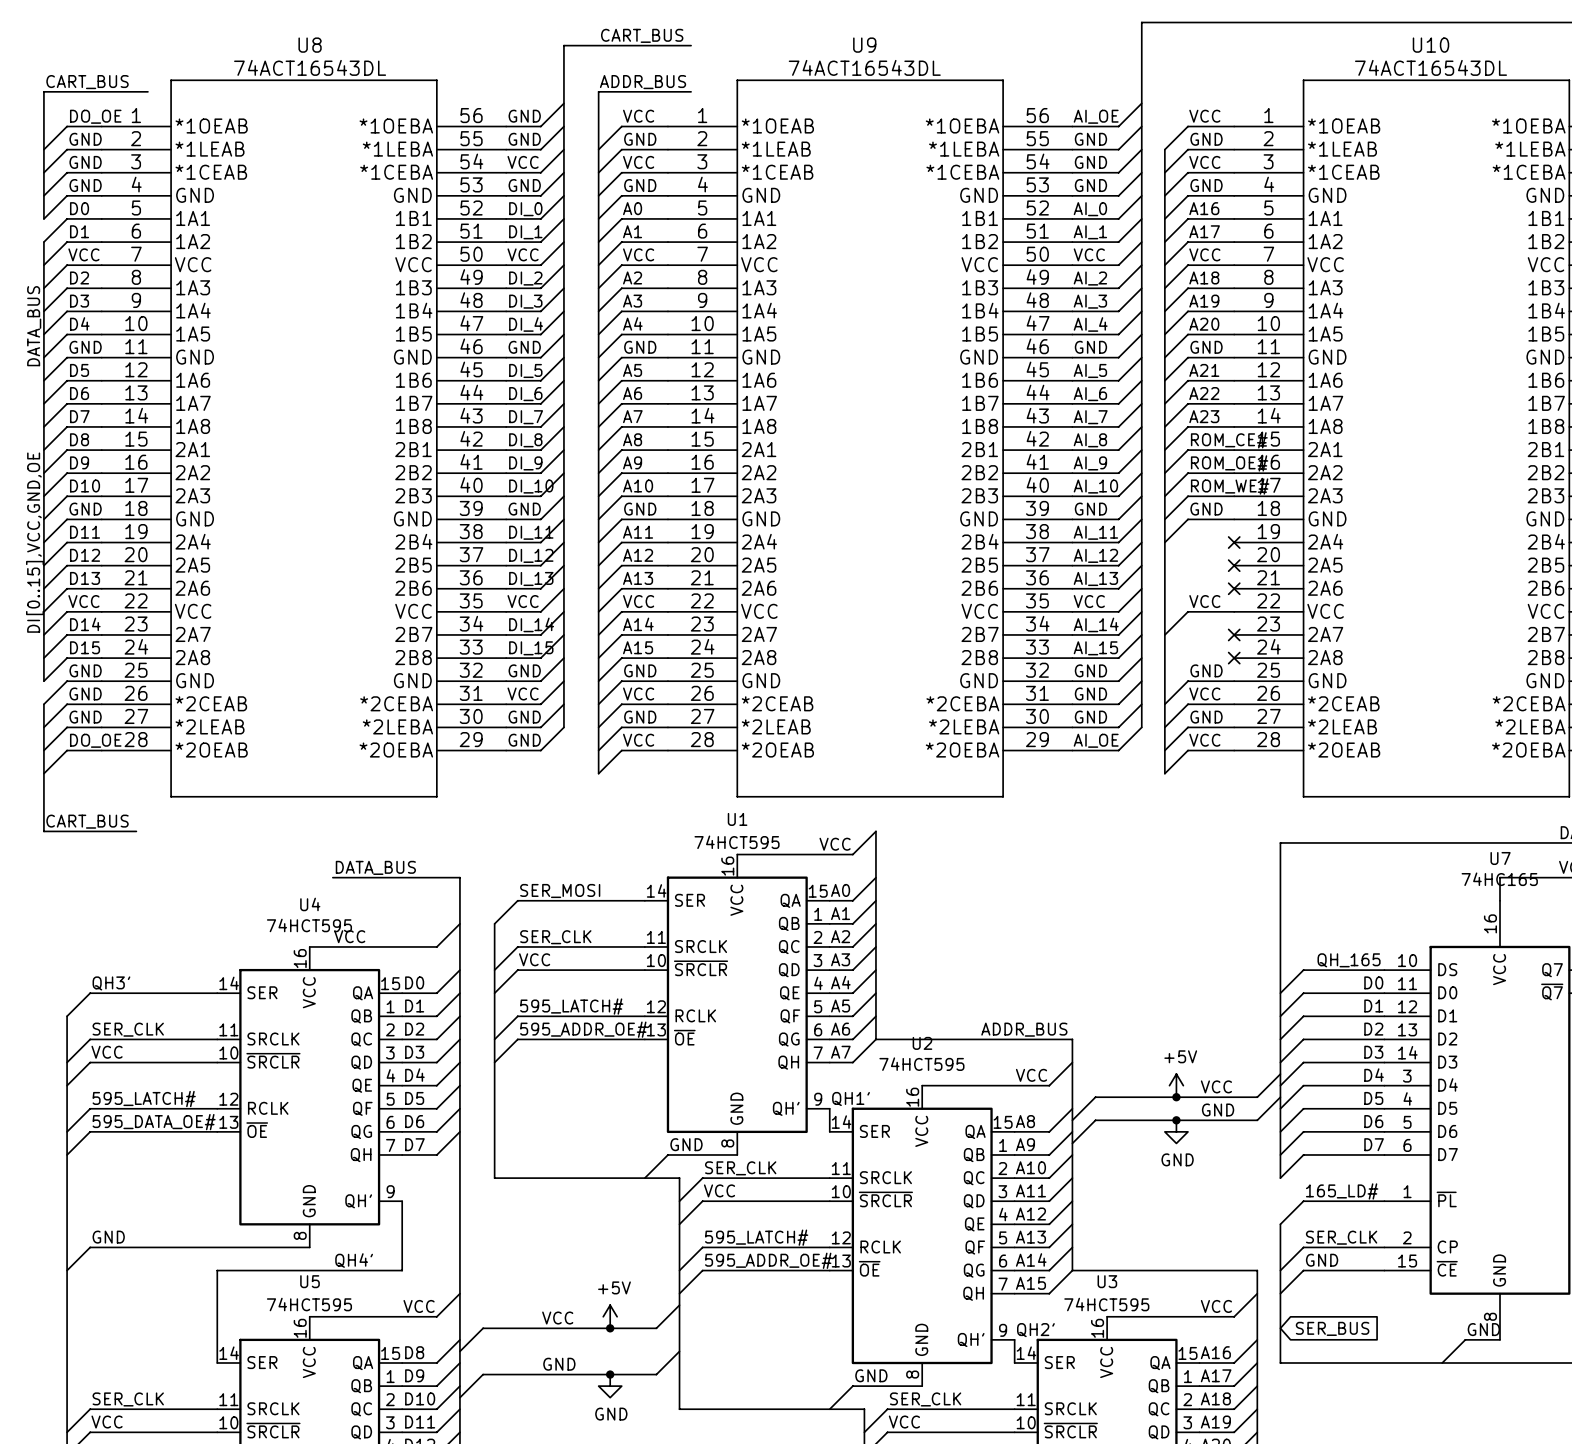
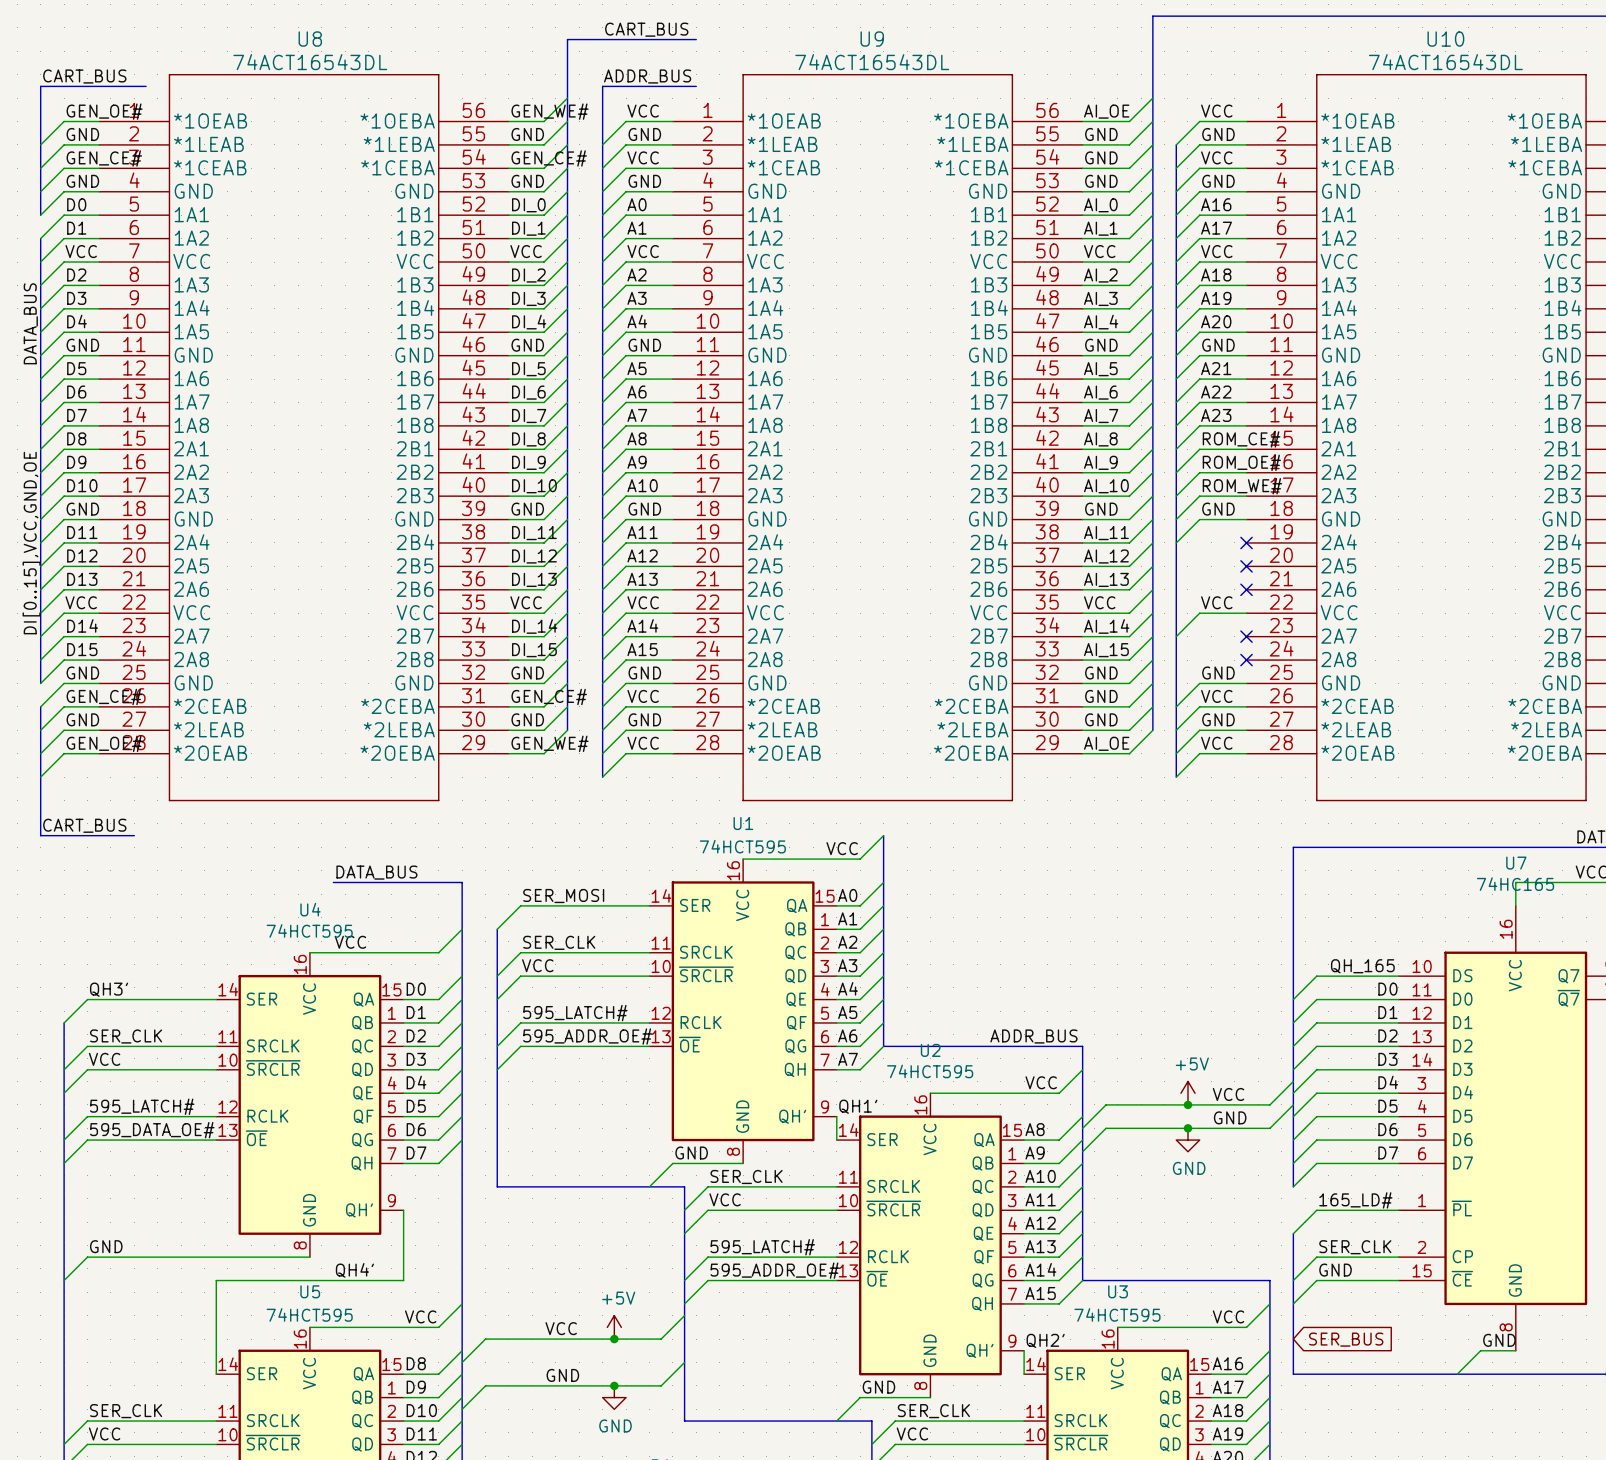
label: DO_OE (95, 116) -> GEN_OE# (104, 111)
label: GND (524, 116) -> GEN_WE# (550, 111)
label: GND (85, 162) -> GEN_CE# (104, 158)
label: VCC (523, 162) -> GEN_CE# (549, 158)
label: GND (85, 693) -> GEN_CE# (104, 696)
label: VCC (523, 693) -> GEN_CE# (549, 696)
label: DO_OE (95, 740) -> GEN_OE# (104, 743)
label: GND (524, 740) -> GEN_WE# (550, 743)

